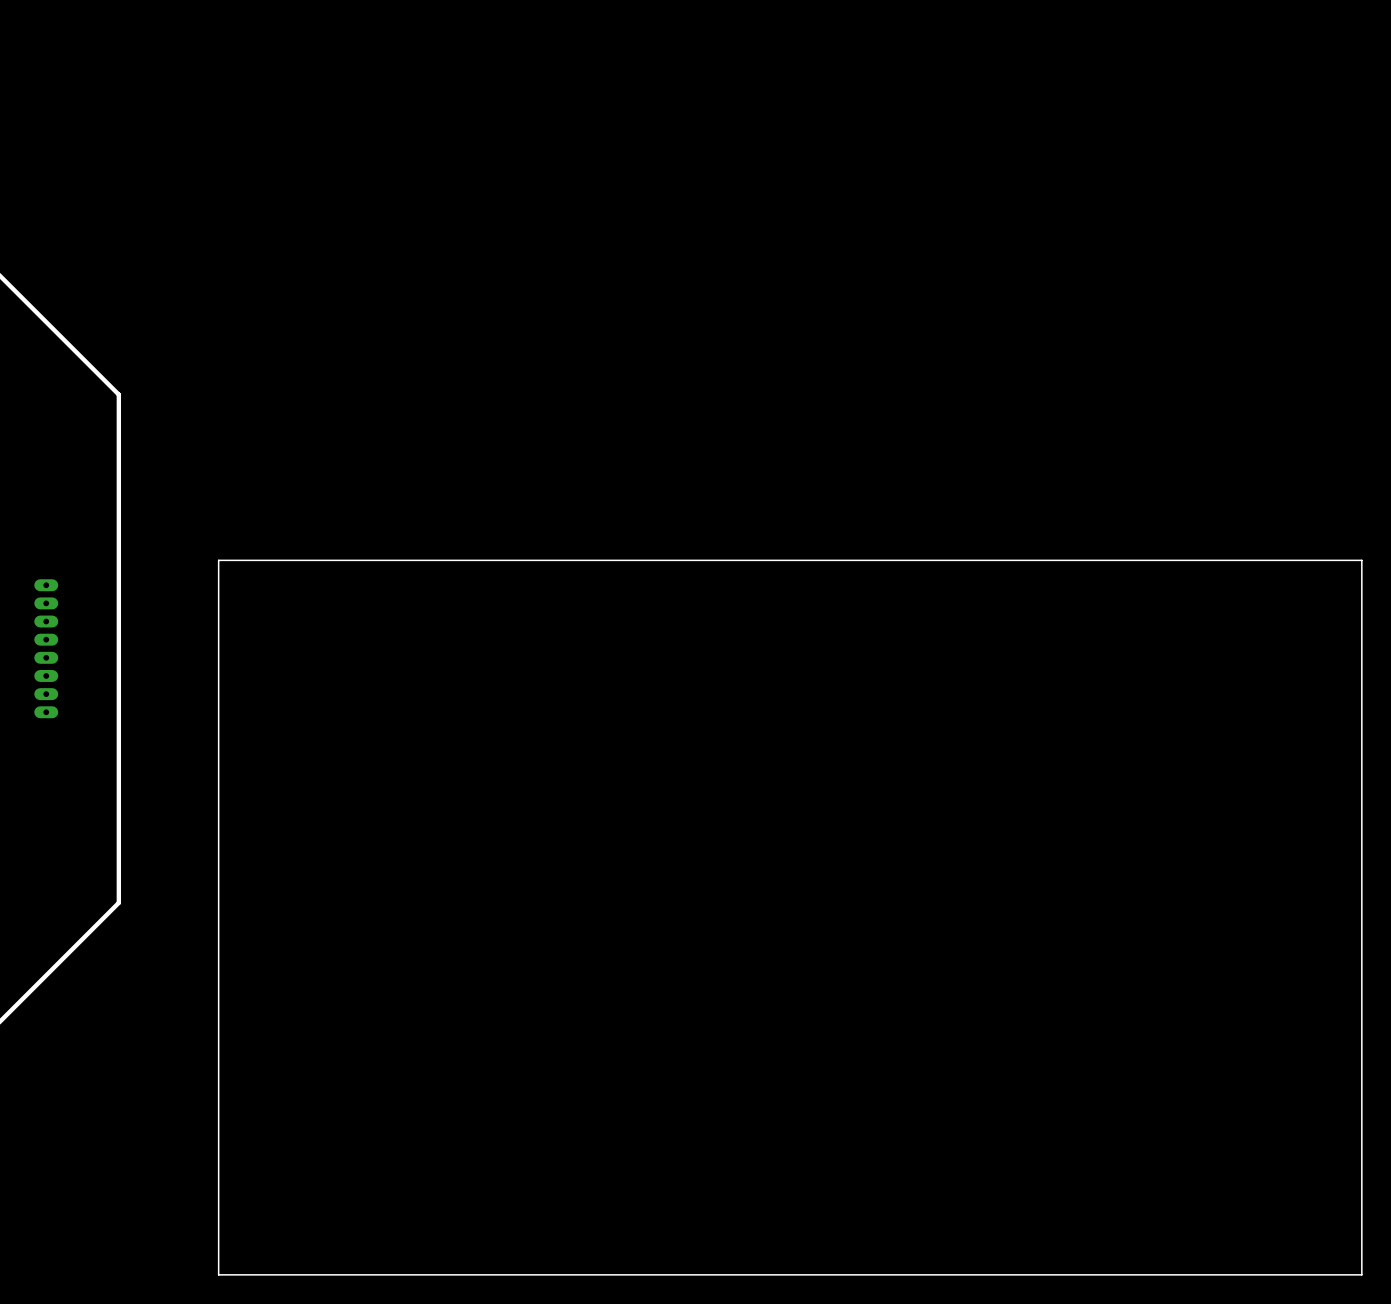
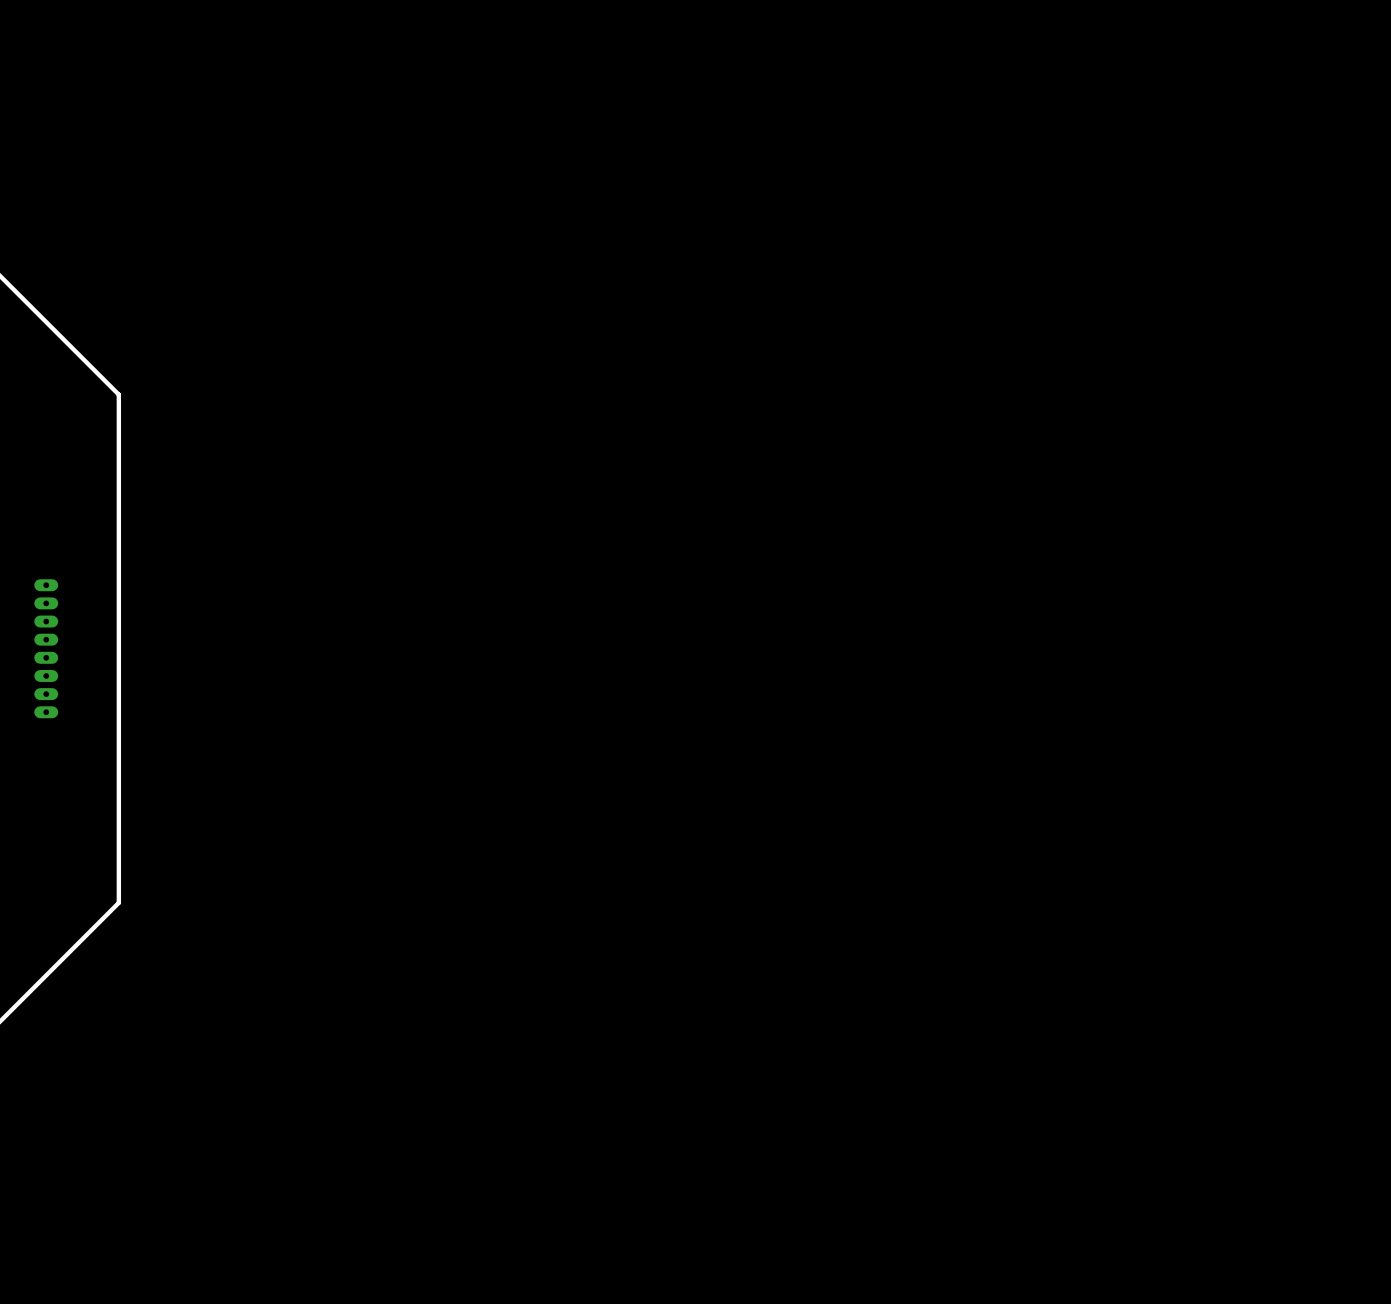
board edge: (218, 560) (1361, 560) (1361, 1274) (218, 1274) (218, 560) -> none

